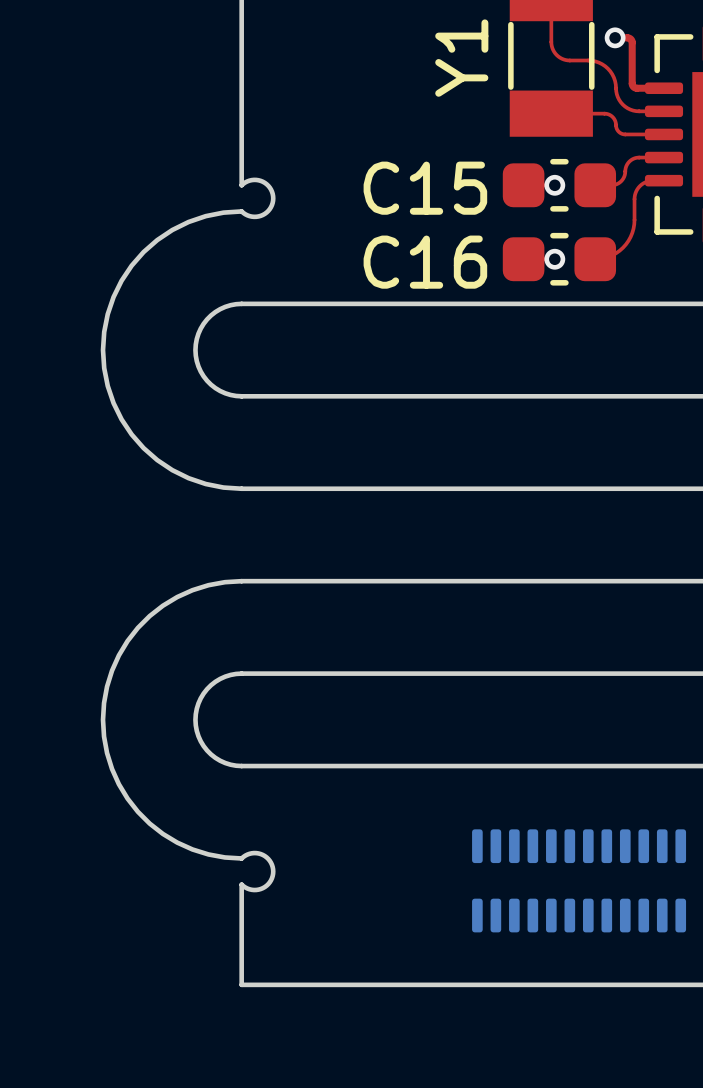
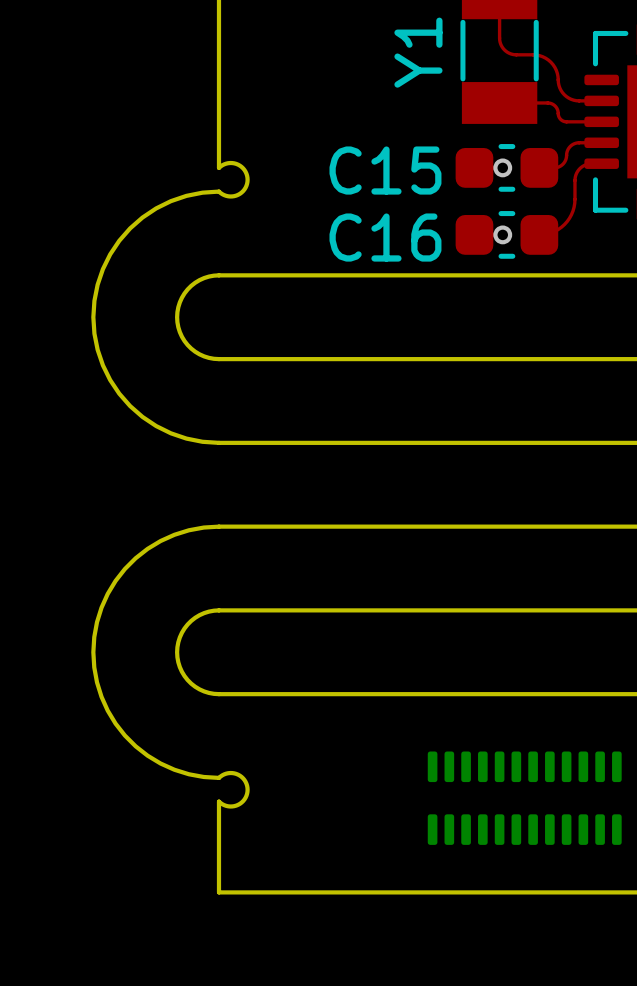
top track: (615, 37) (628, 37) (631, 40) (633, 86) (663, 88) -> none
via: (615, 37) -> none

